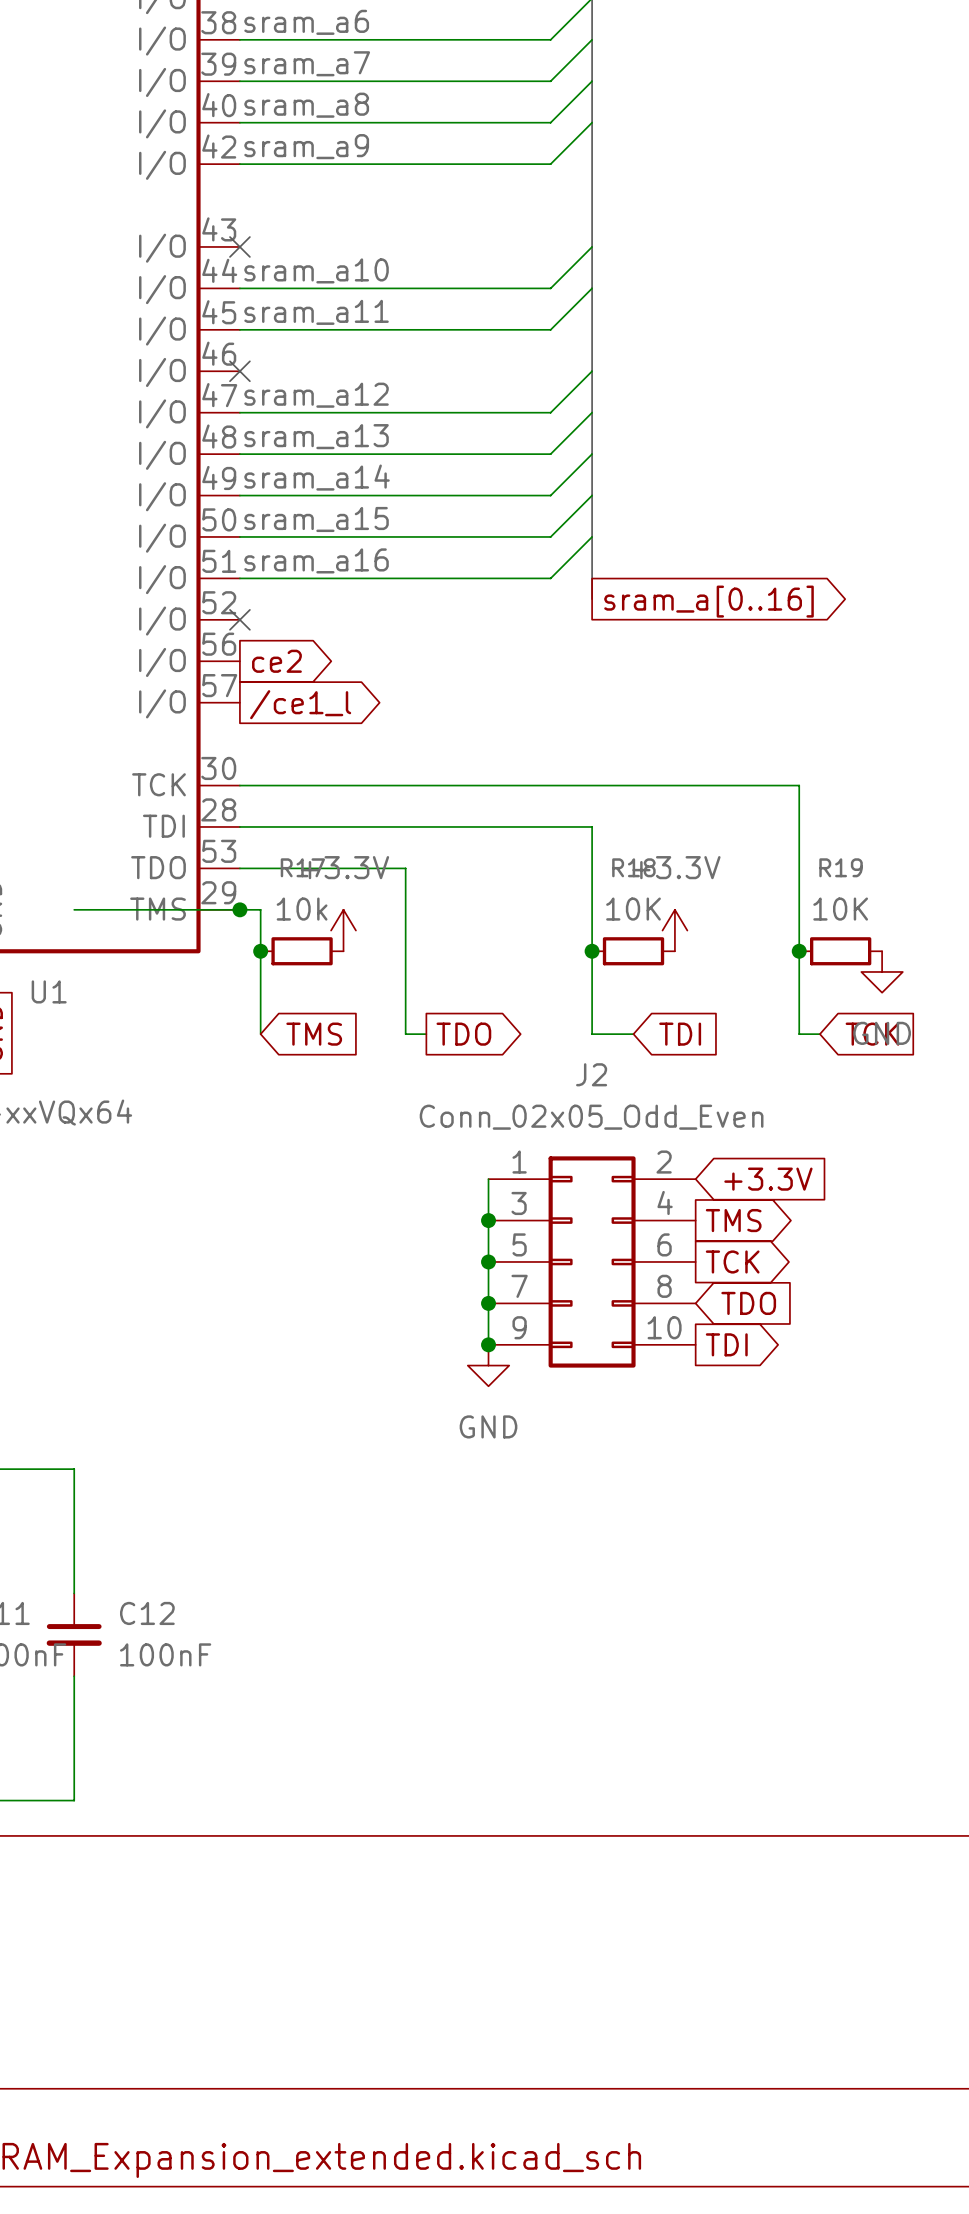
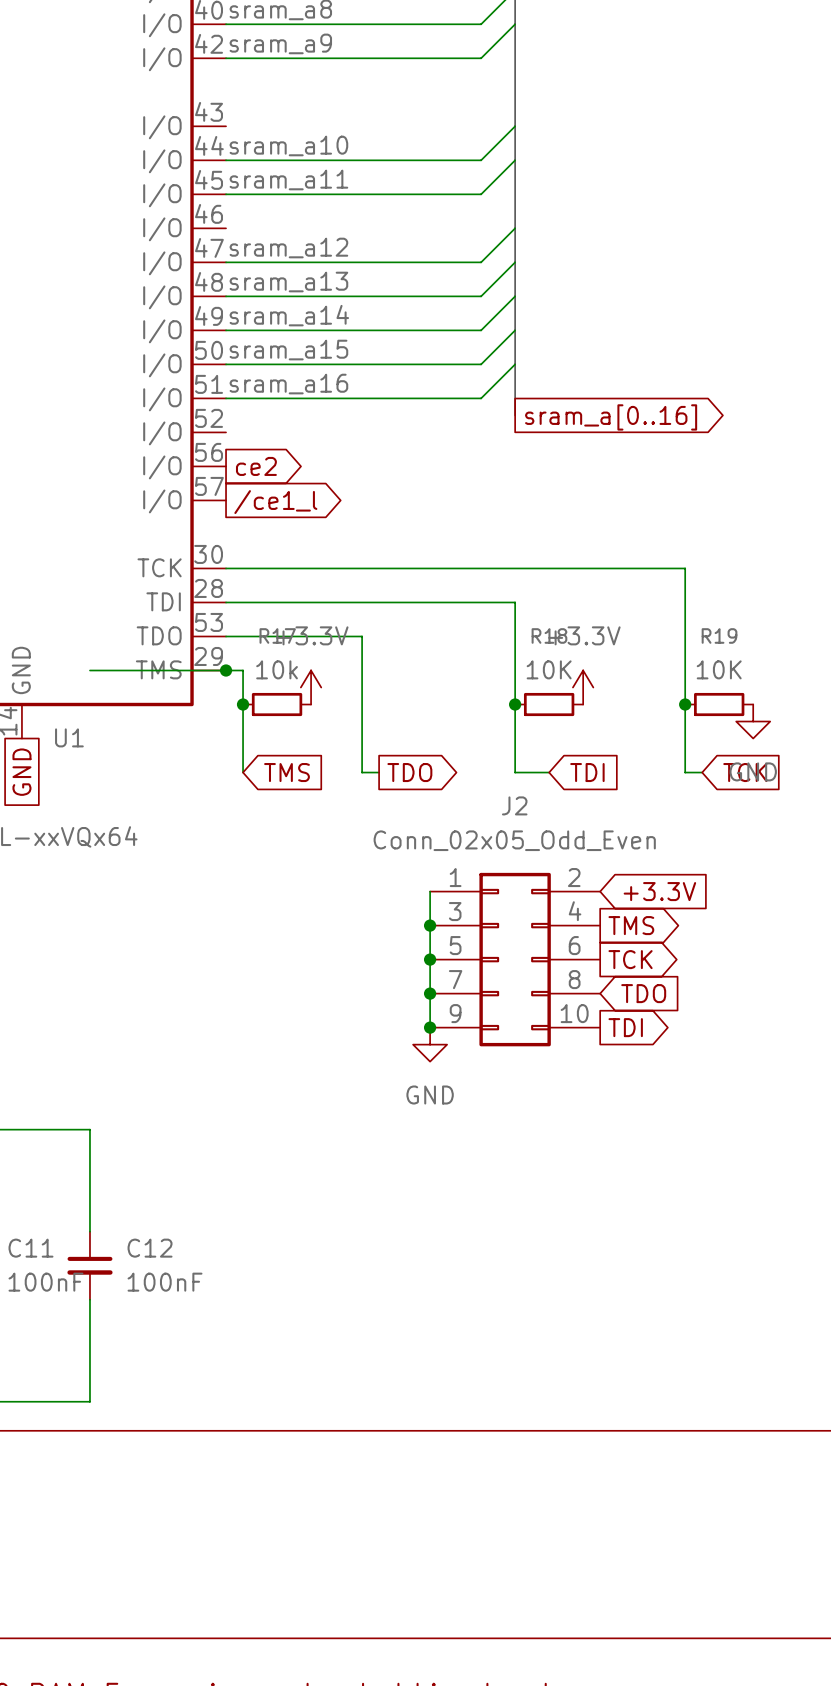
no-connect mark: (239, 246) -> none
no-connect mark: (239, 371) -> none
no-connect mark: (239, 619) -> none

